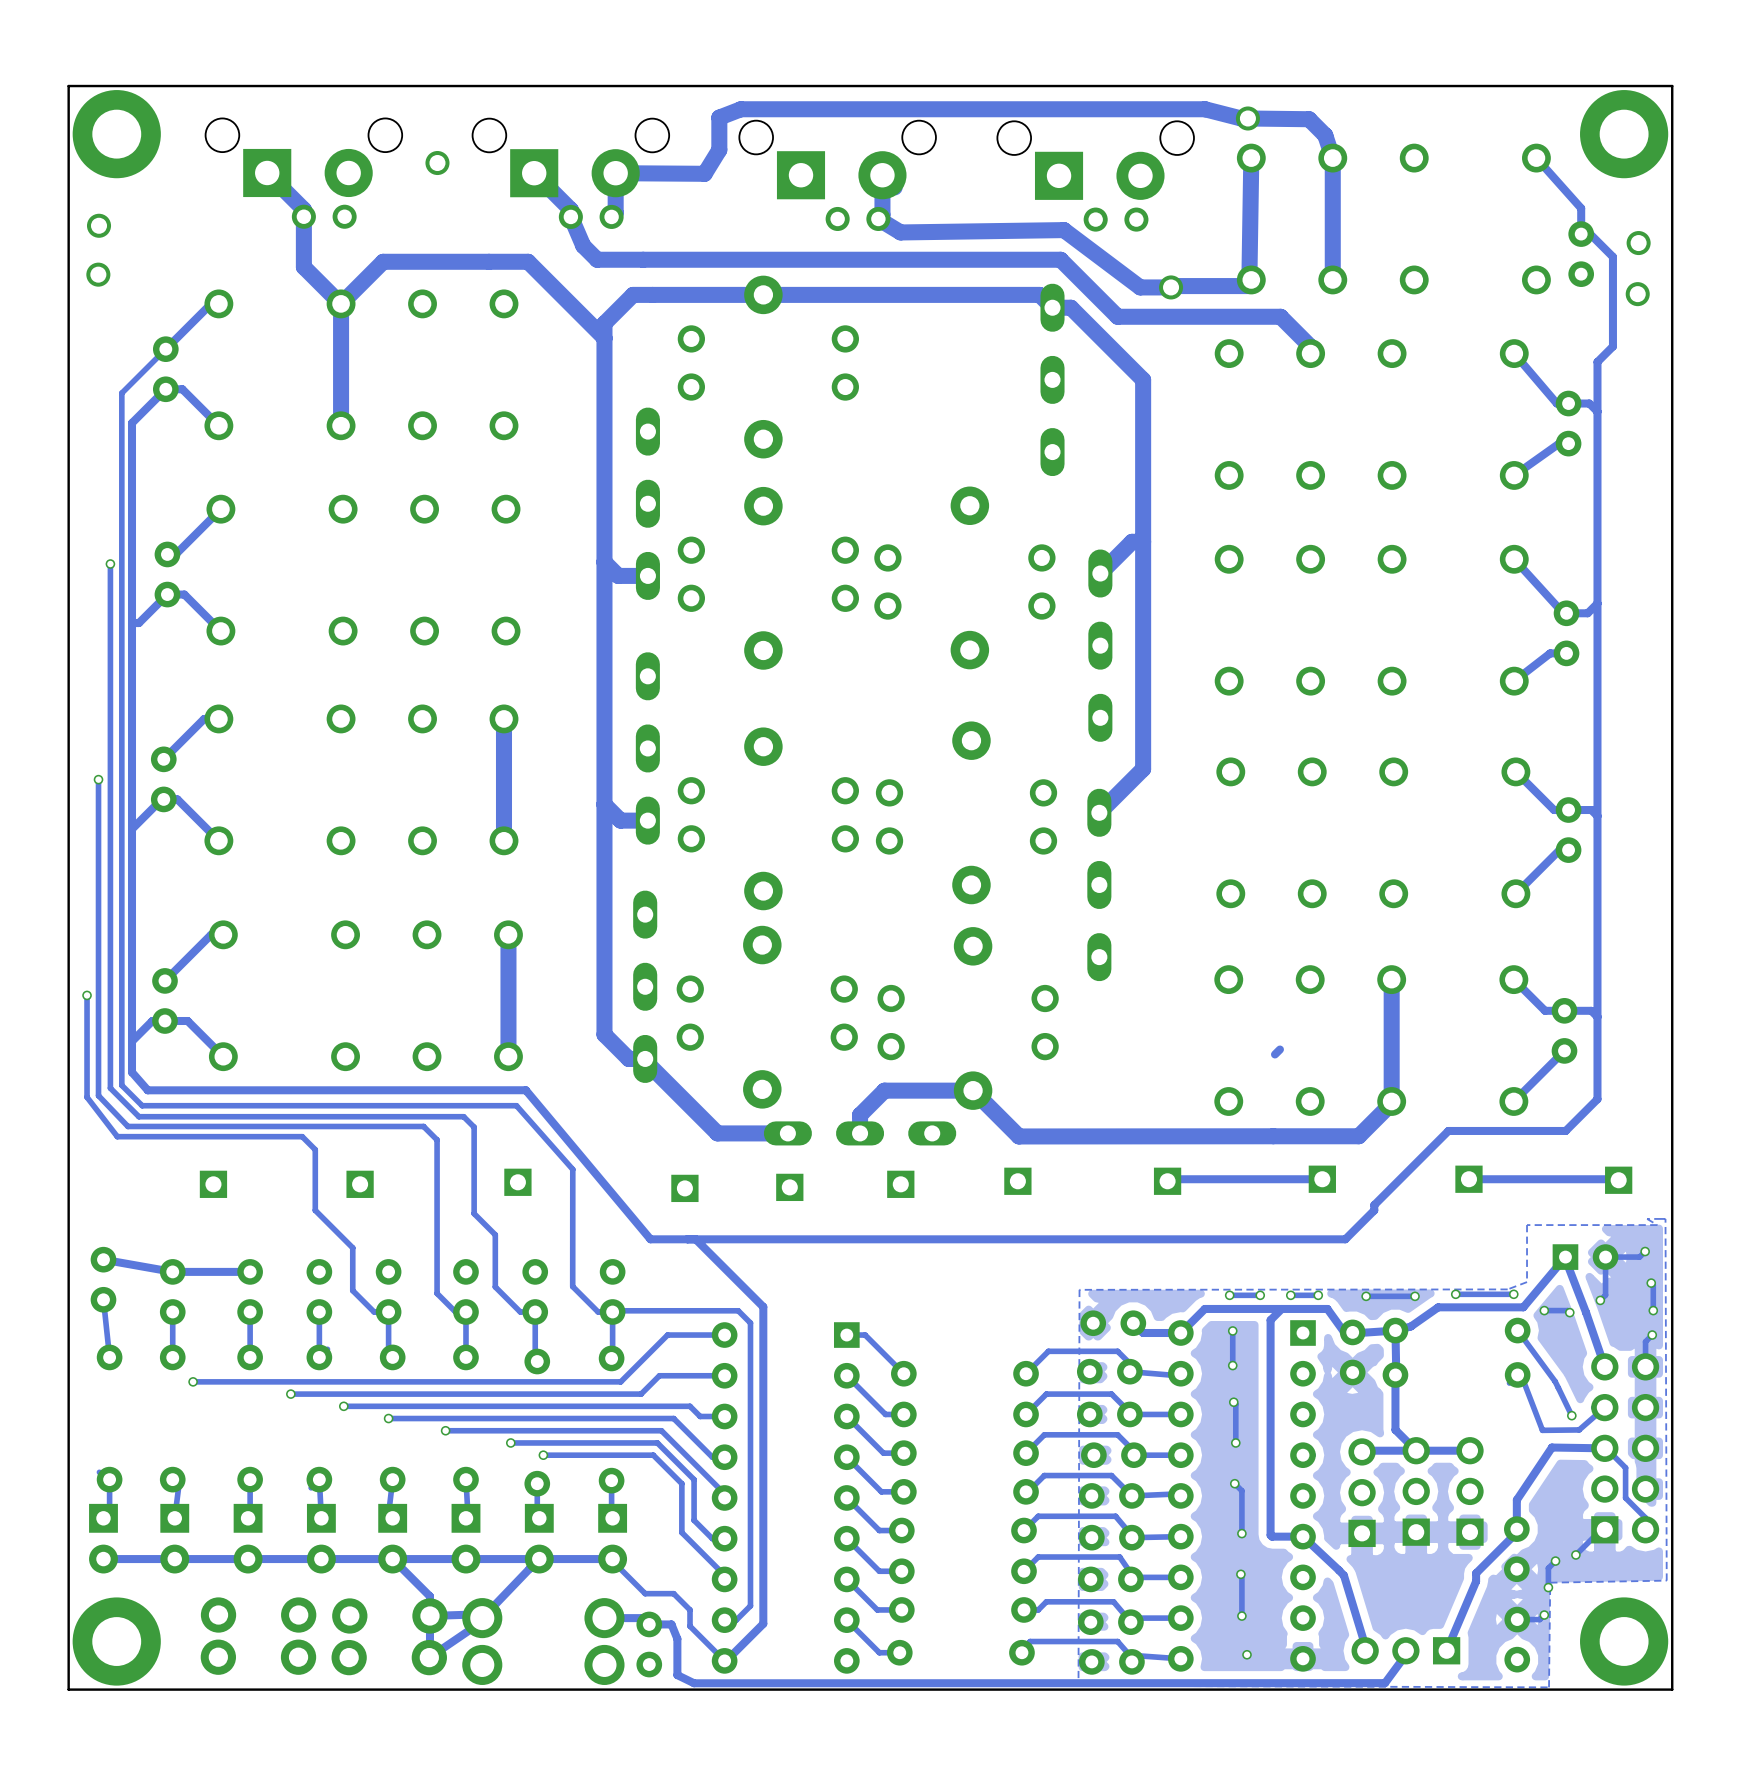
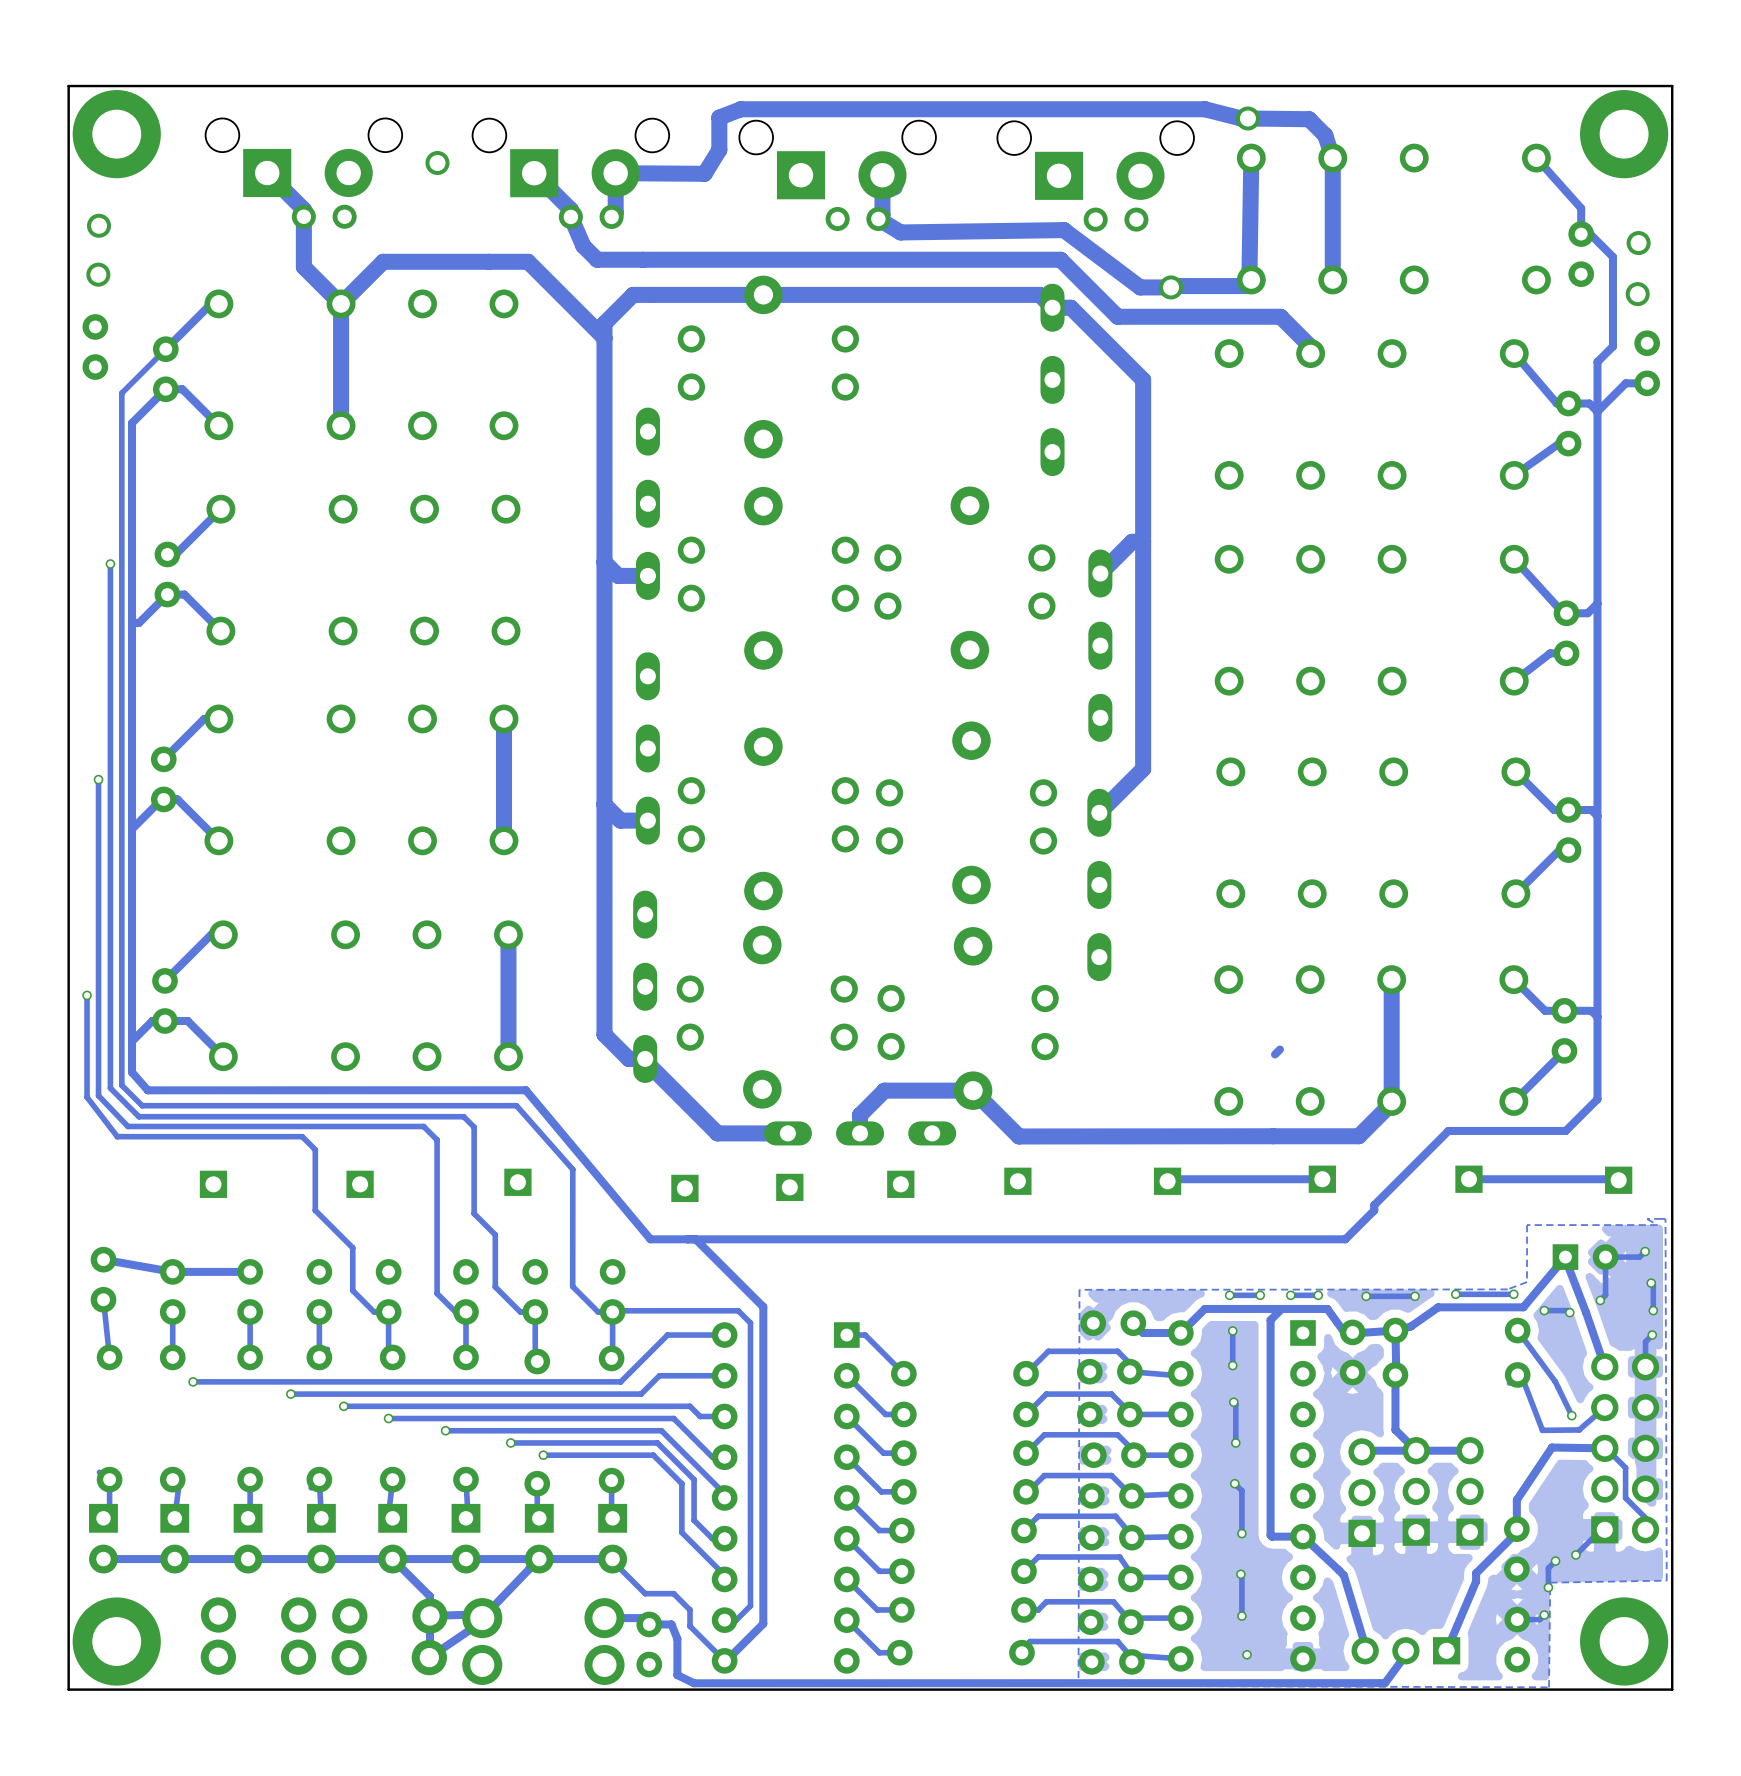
part: none -> (95, 346)
part: none -> (1647, 363)
track: none -> (1647, 383) (1625, 383) (1597, 411)

